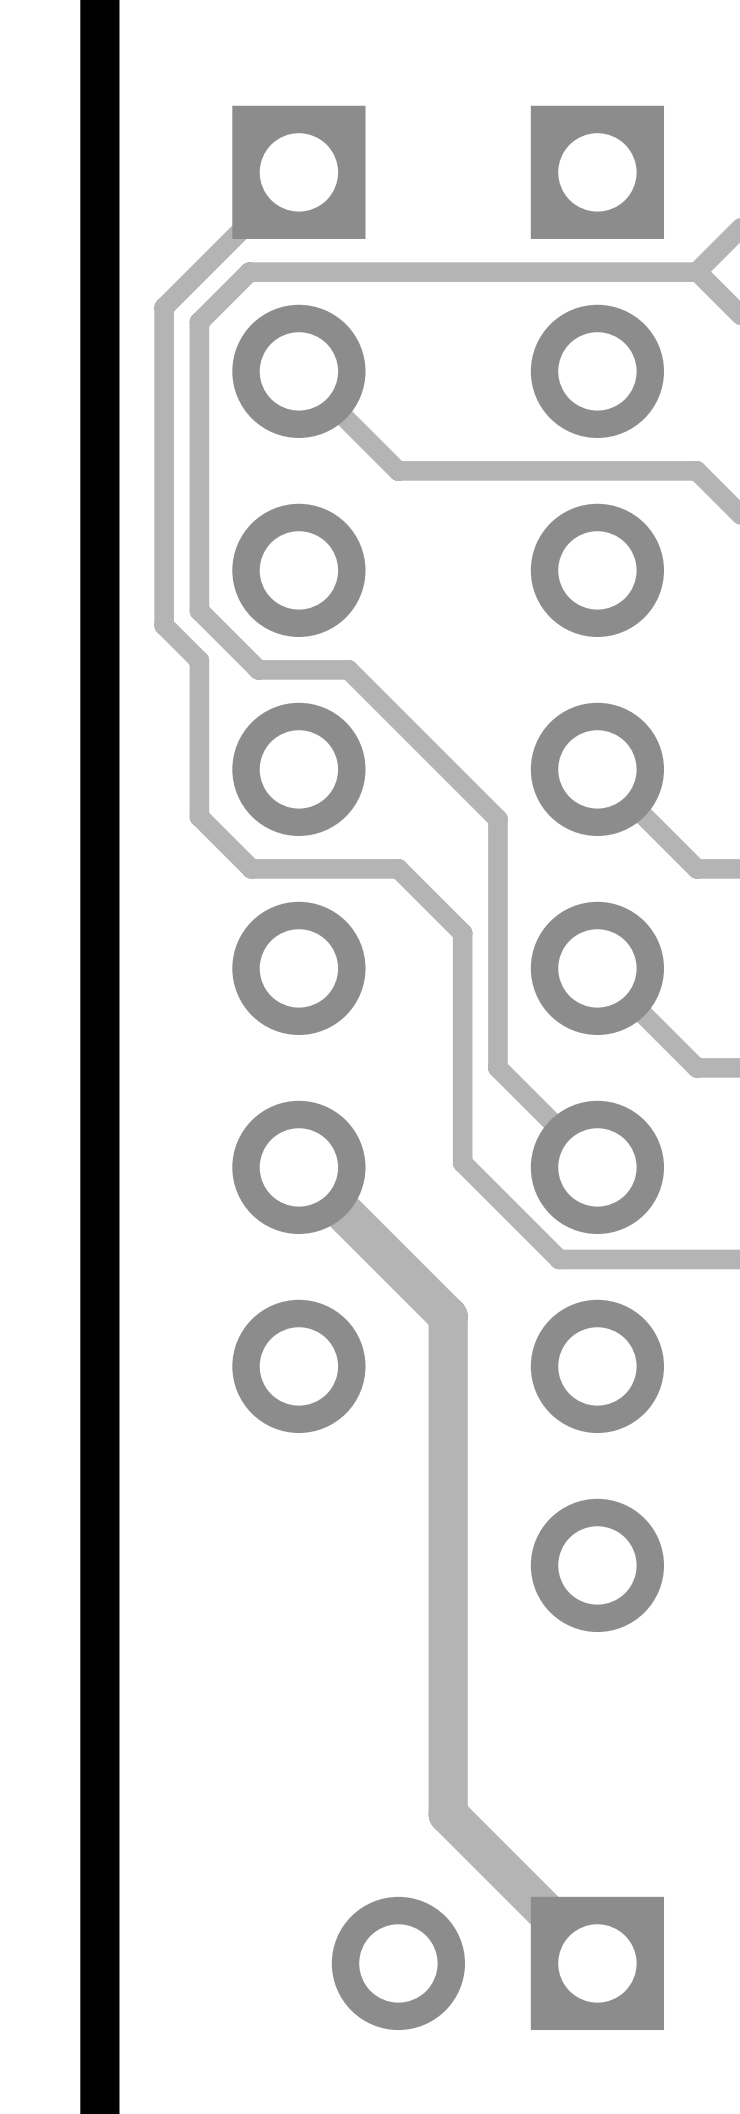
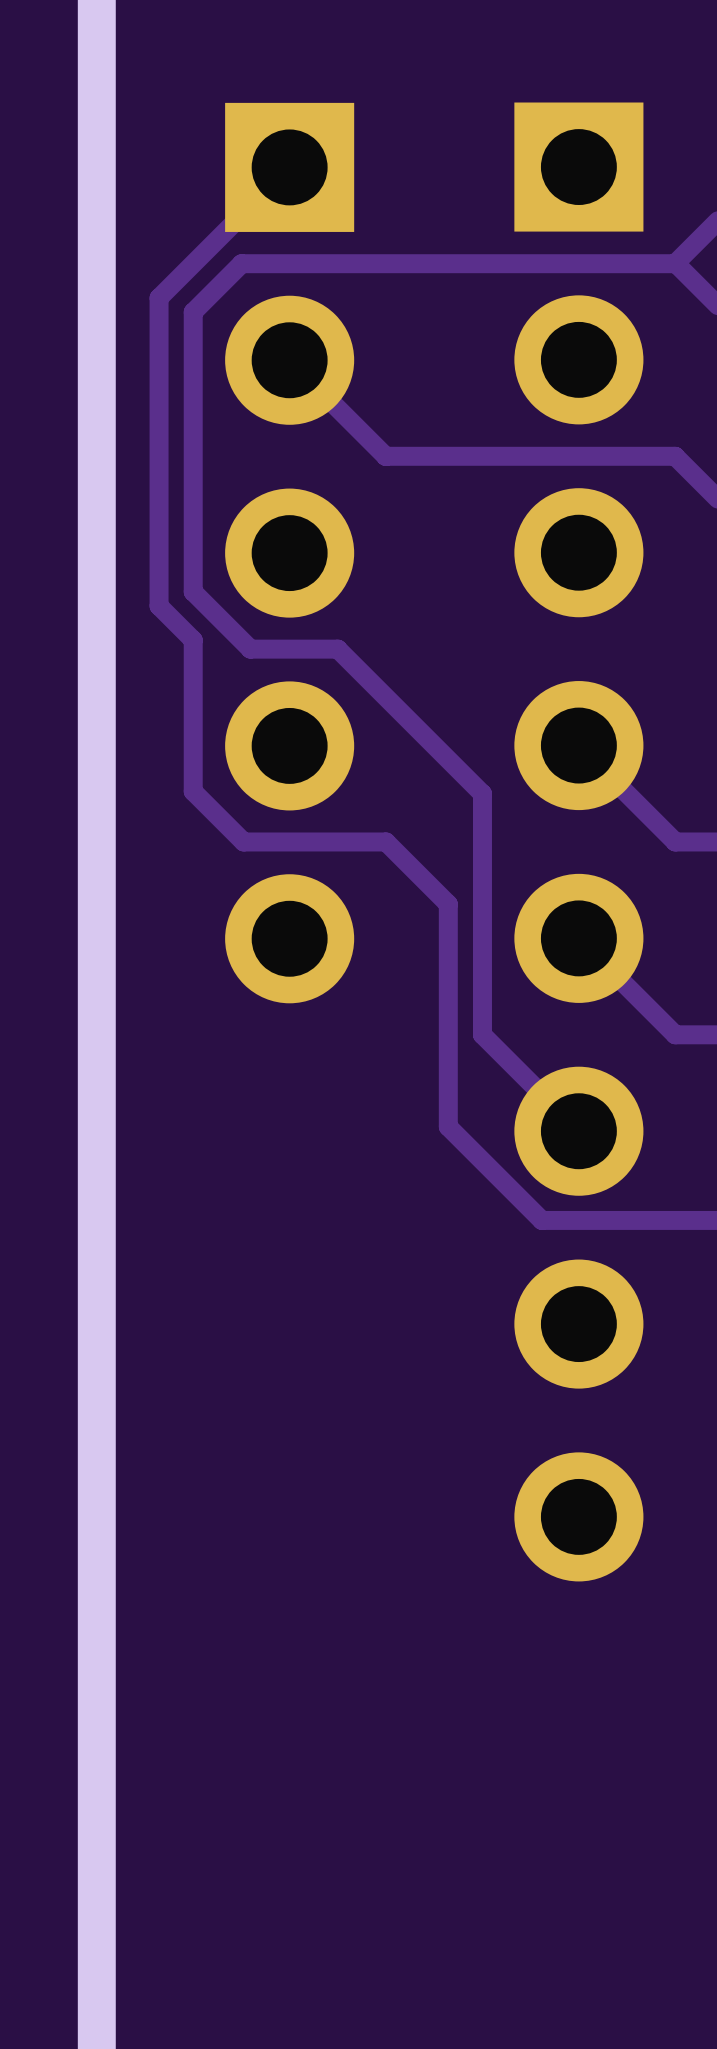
part: none -> (289, 553)
part: (298, 769) -> none
track: (298, 1167) (448, 1316) (448, 1814) (597, 1963) -> none
part: (497, 1963) -> none

